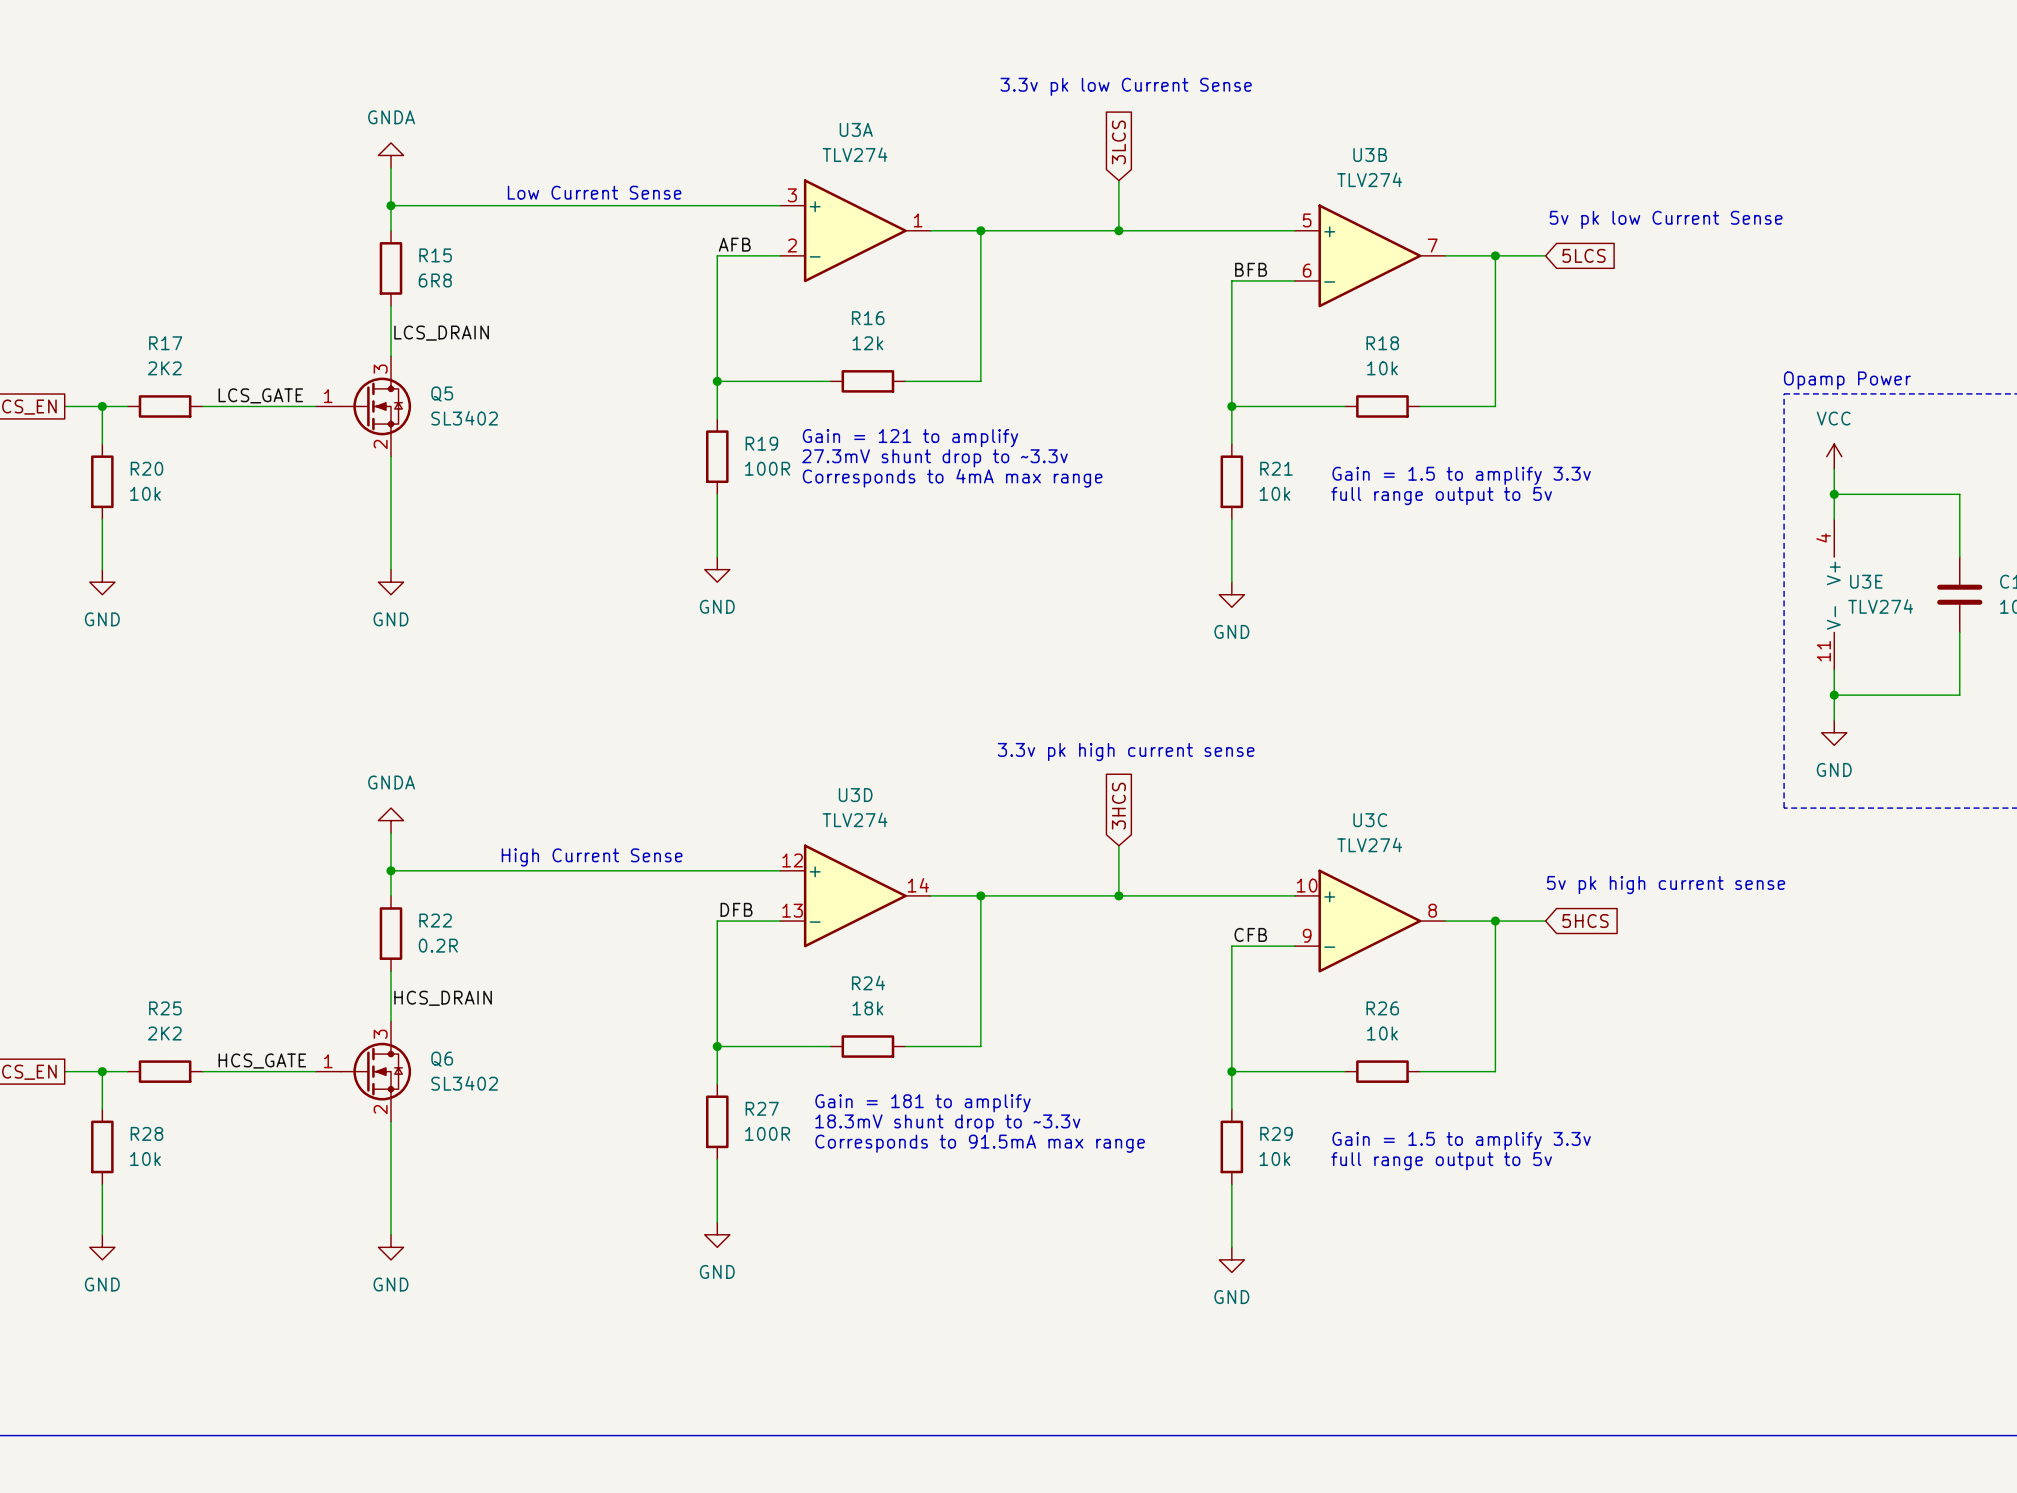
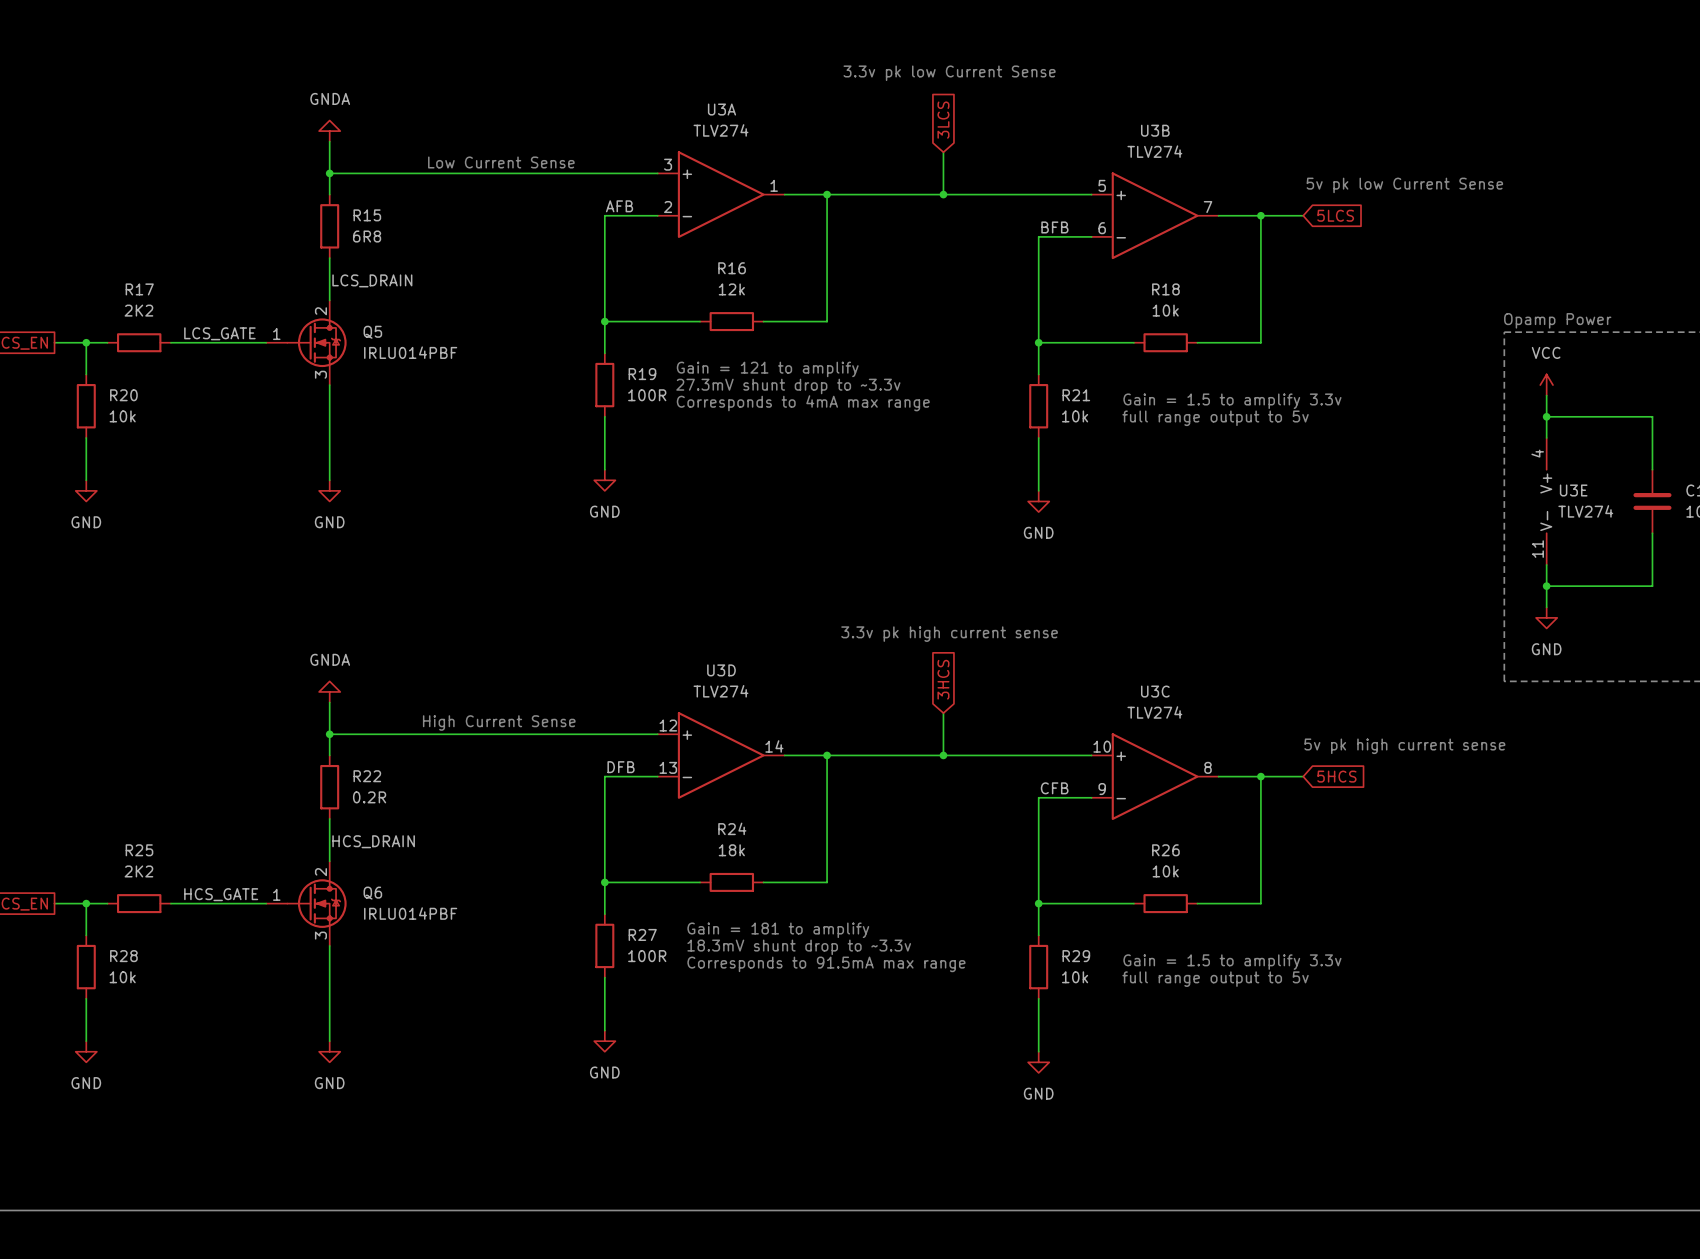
Q5 symbol: [315, 356, 412, 457] -> [266, 300, 347, 386]
Q5 value: SL3402 (464, 418) -> IRLU014PBF (410, 352)
Q6 symbol: [315, 1021, 412, 1122] -> [266, 861, 347, 946]
Q6 value: SL3402 (464, 1083) -> IRLU014PBF (410, 913)

